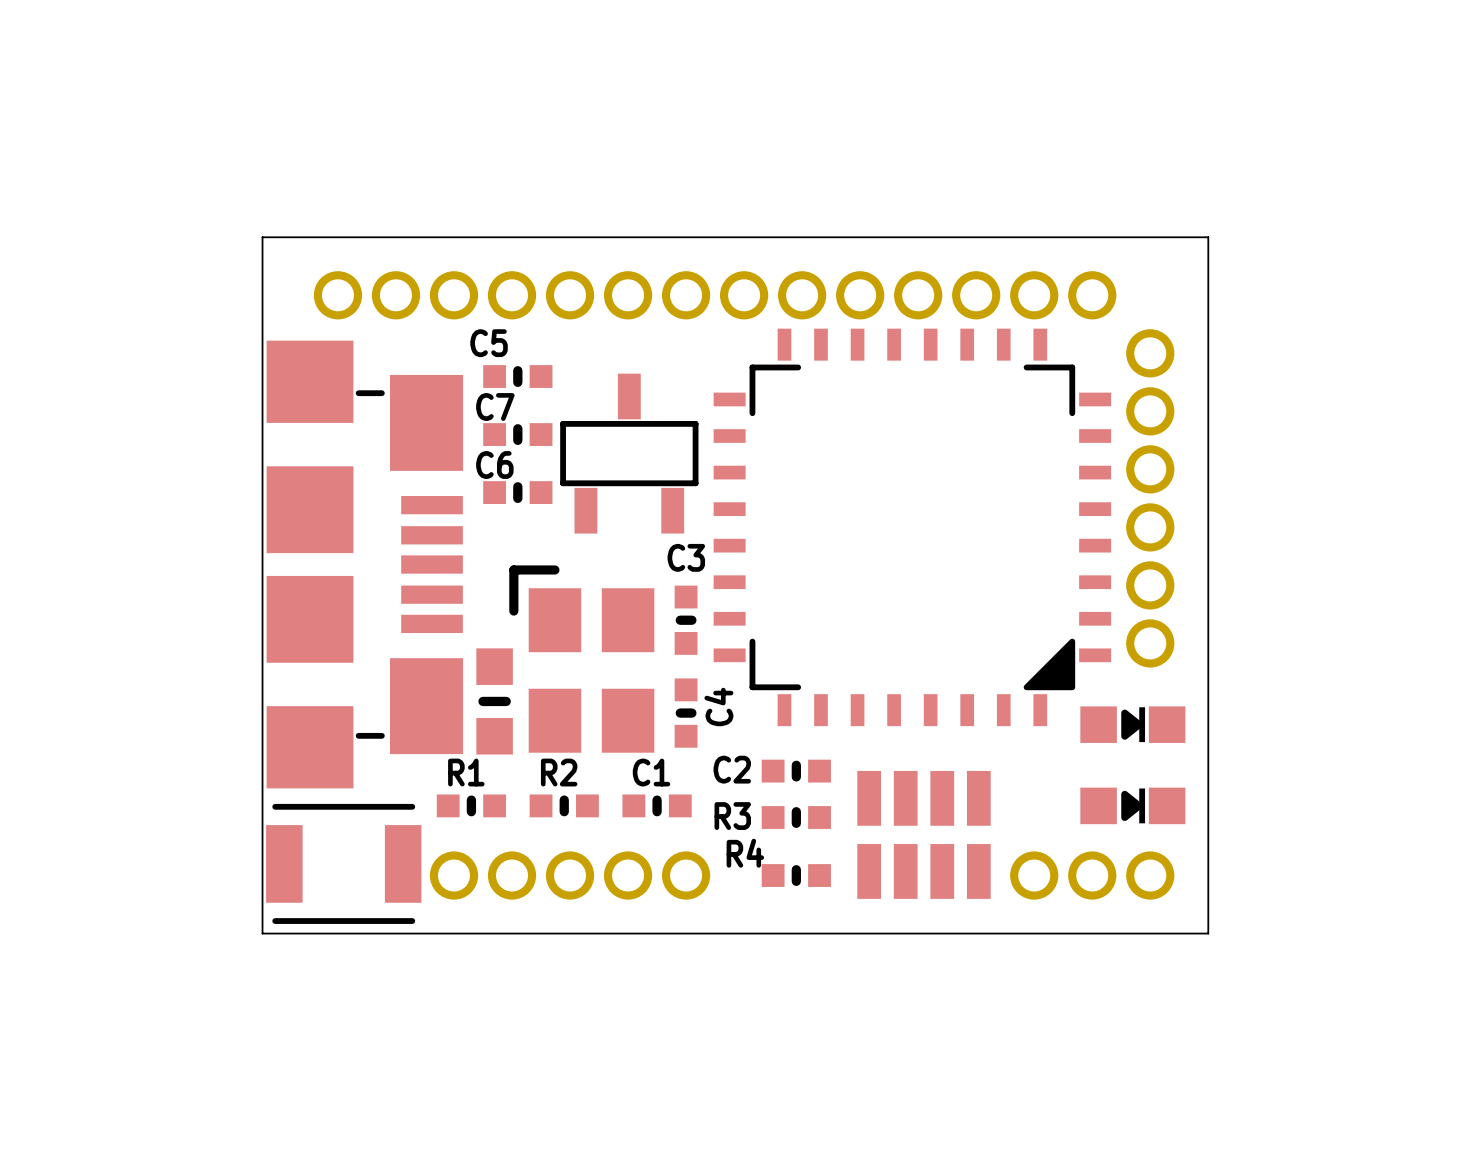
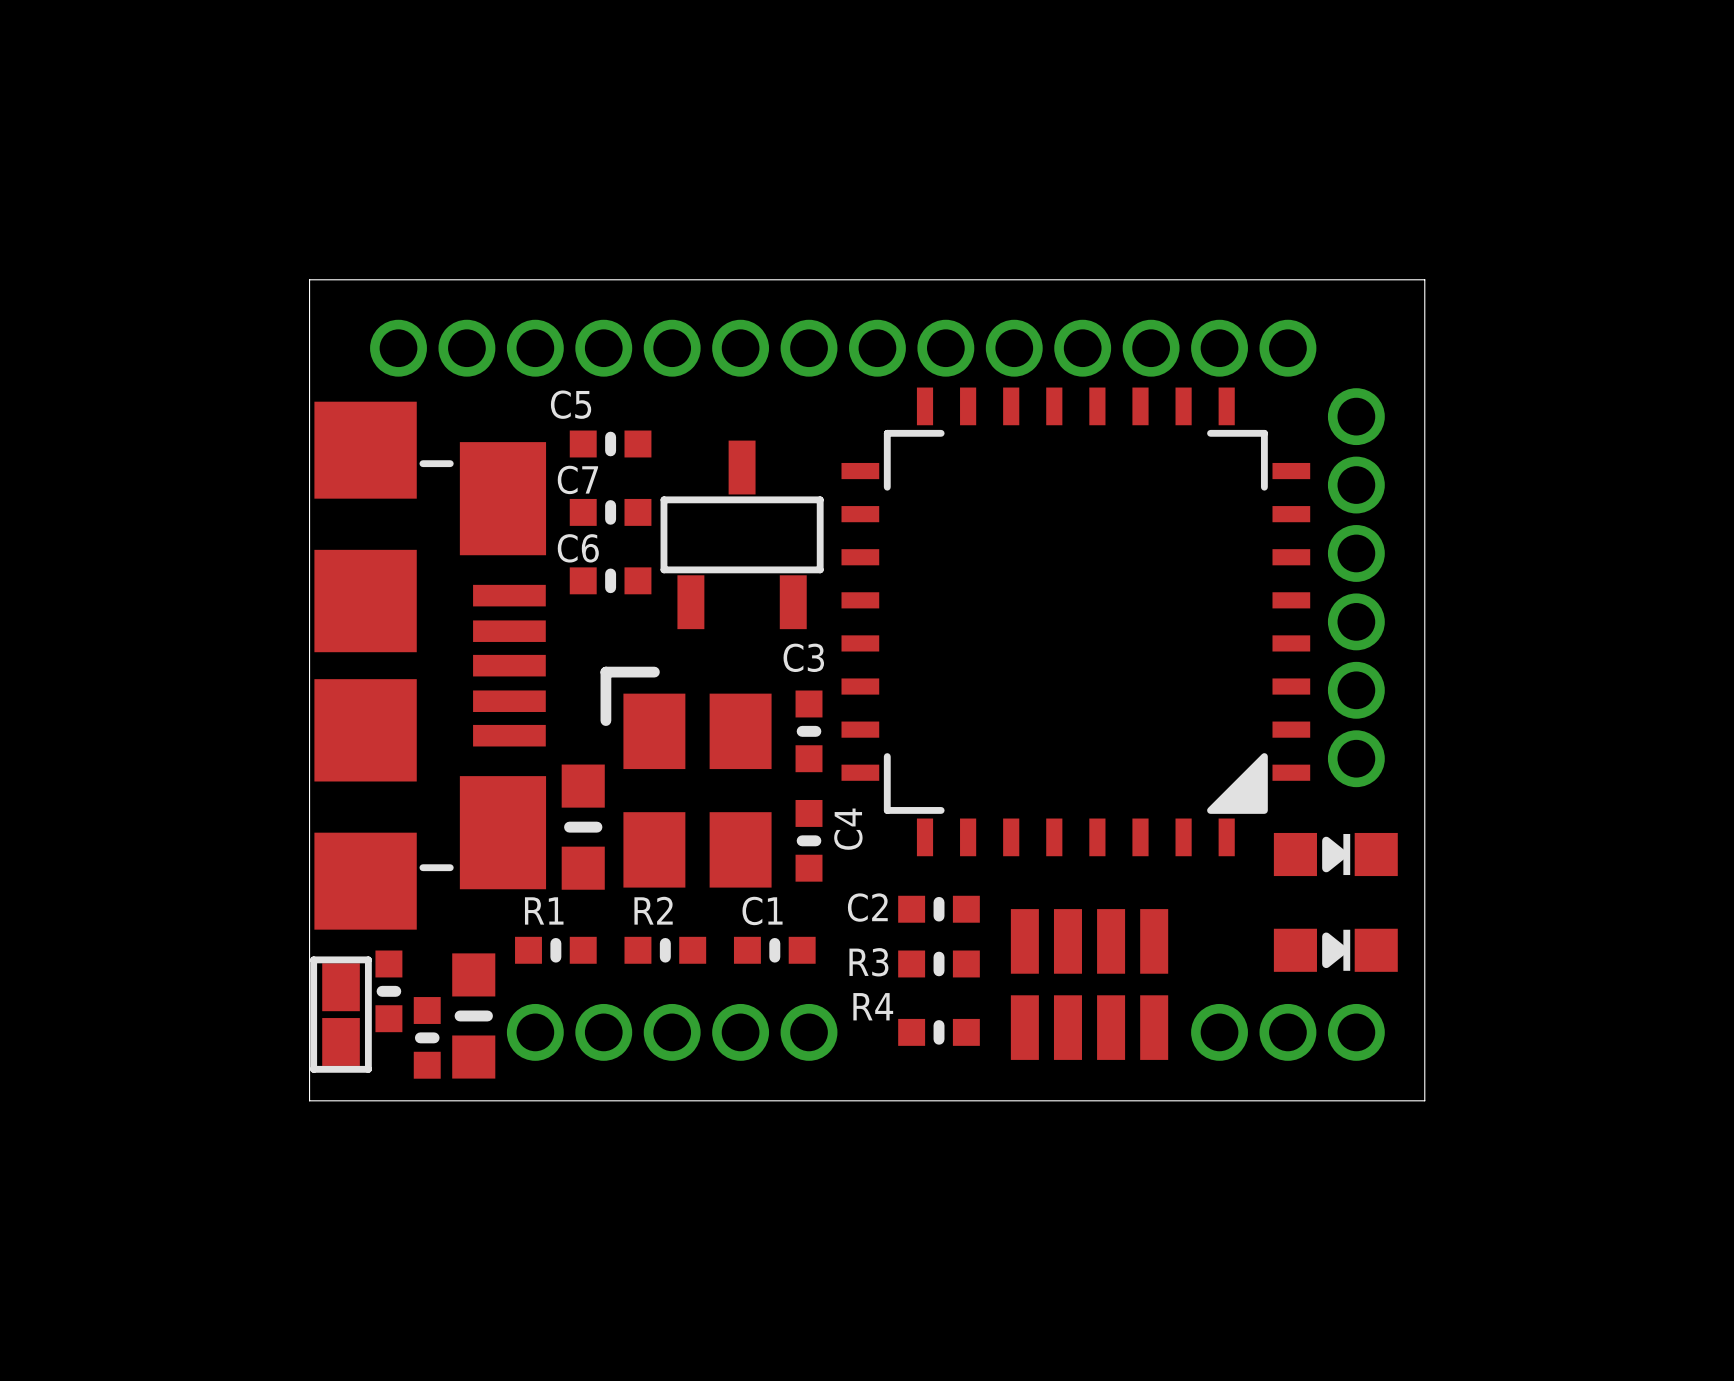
part: none -> (388, 991)
part: none -> (341, 1014)
part: none -> (473, 1015)
part: (343, 863) -> none
part: none -> (427, 1037)

